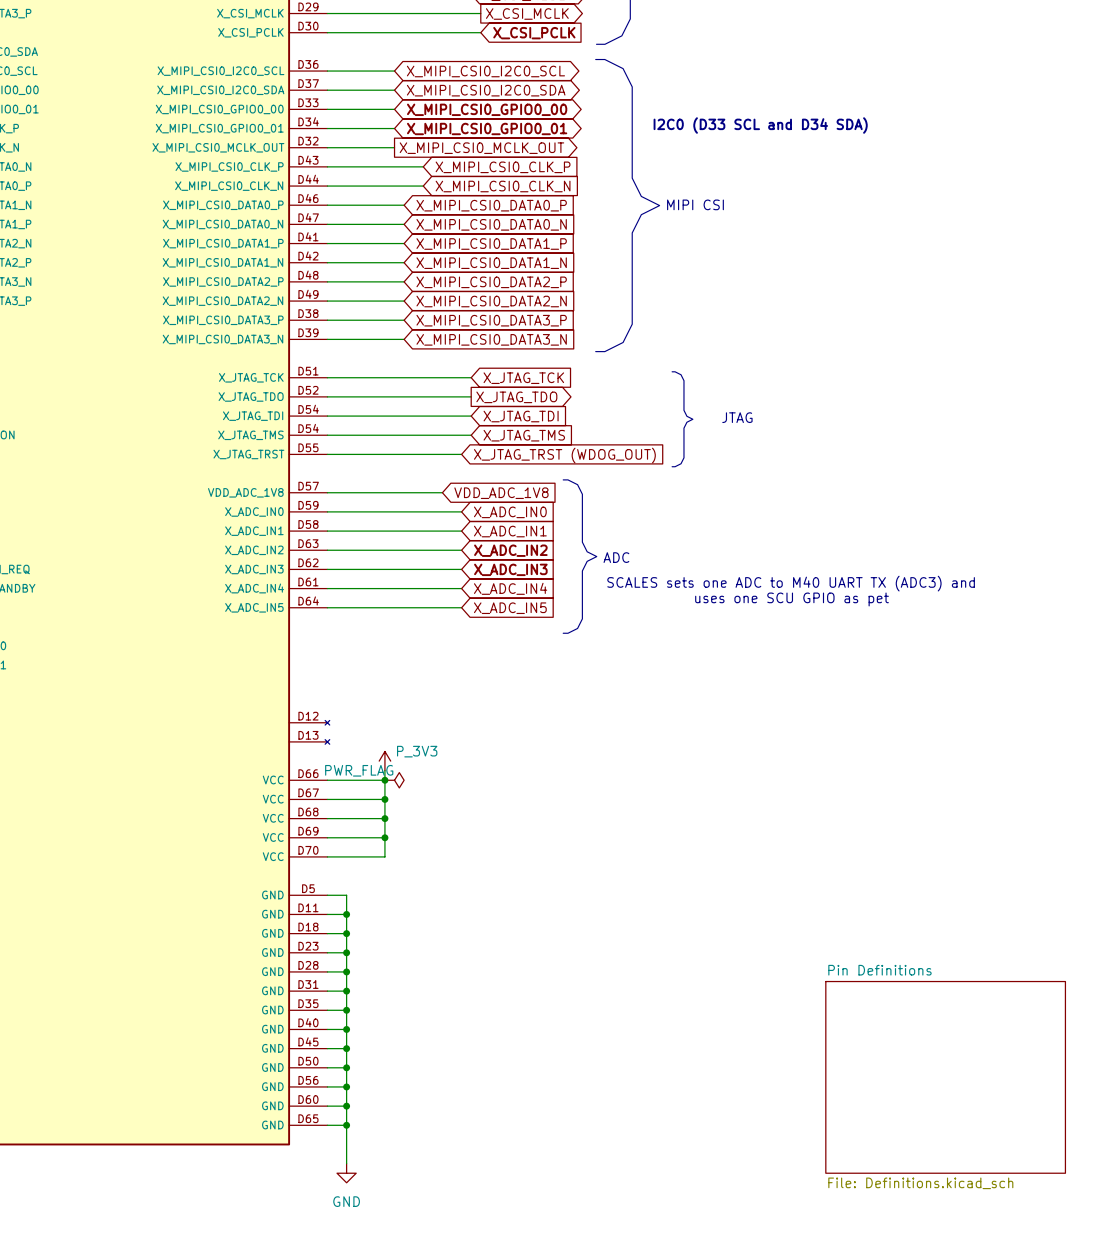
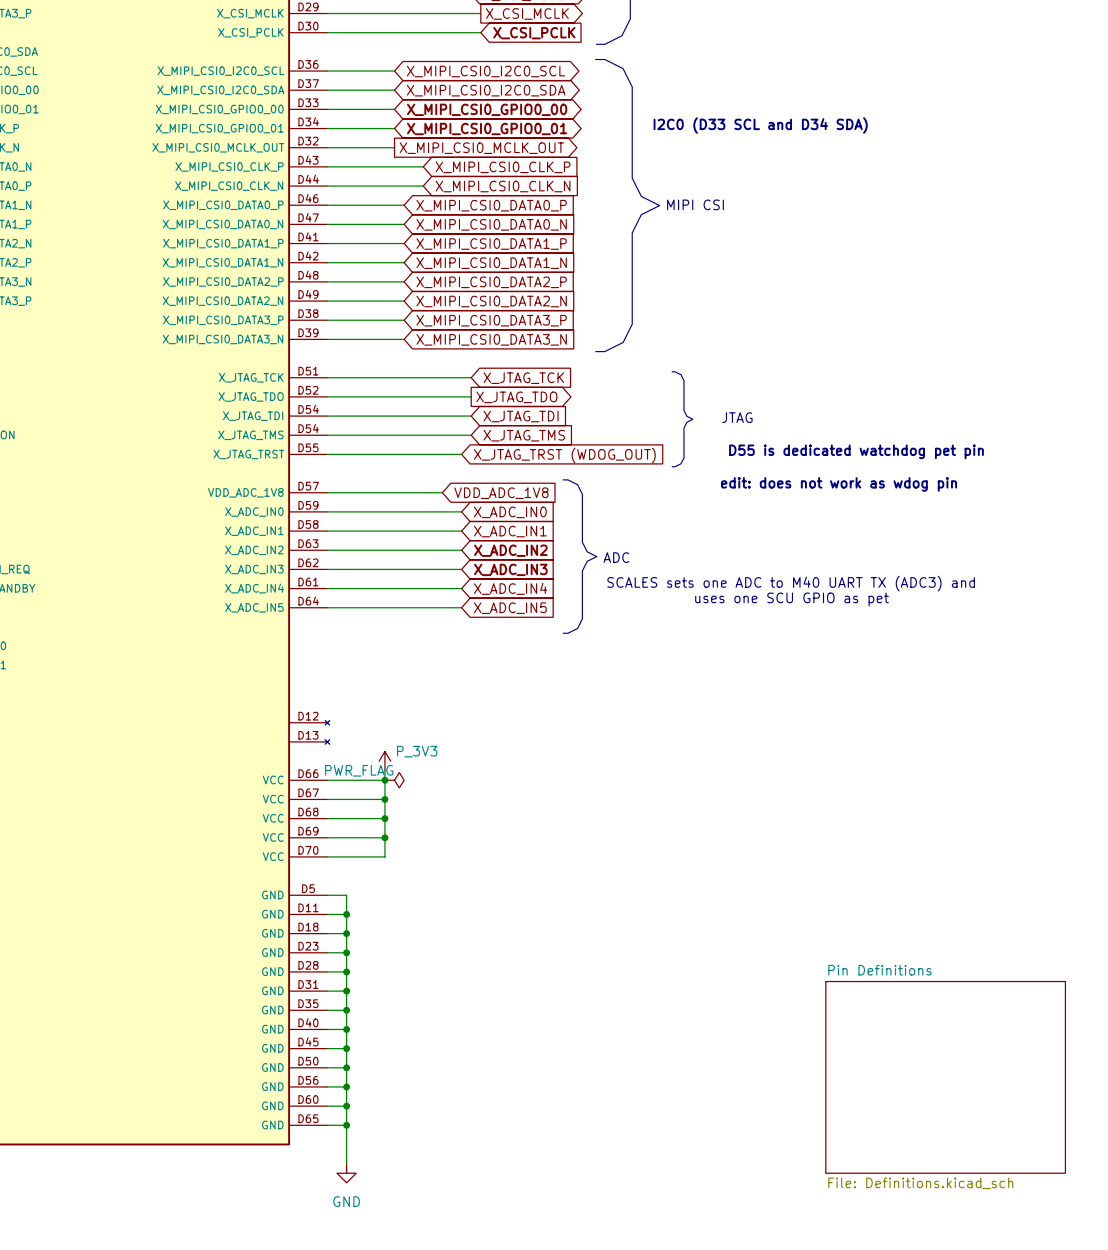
text: none -> D55 is dedicated watchdog pet pin (856, 451)
text: none -> edit: does not work as wdog pin (839, 484)

